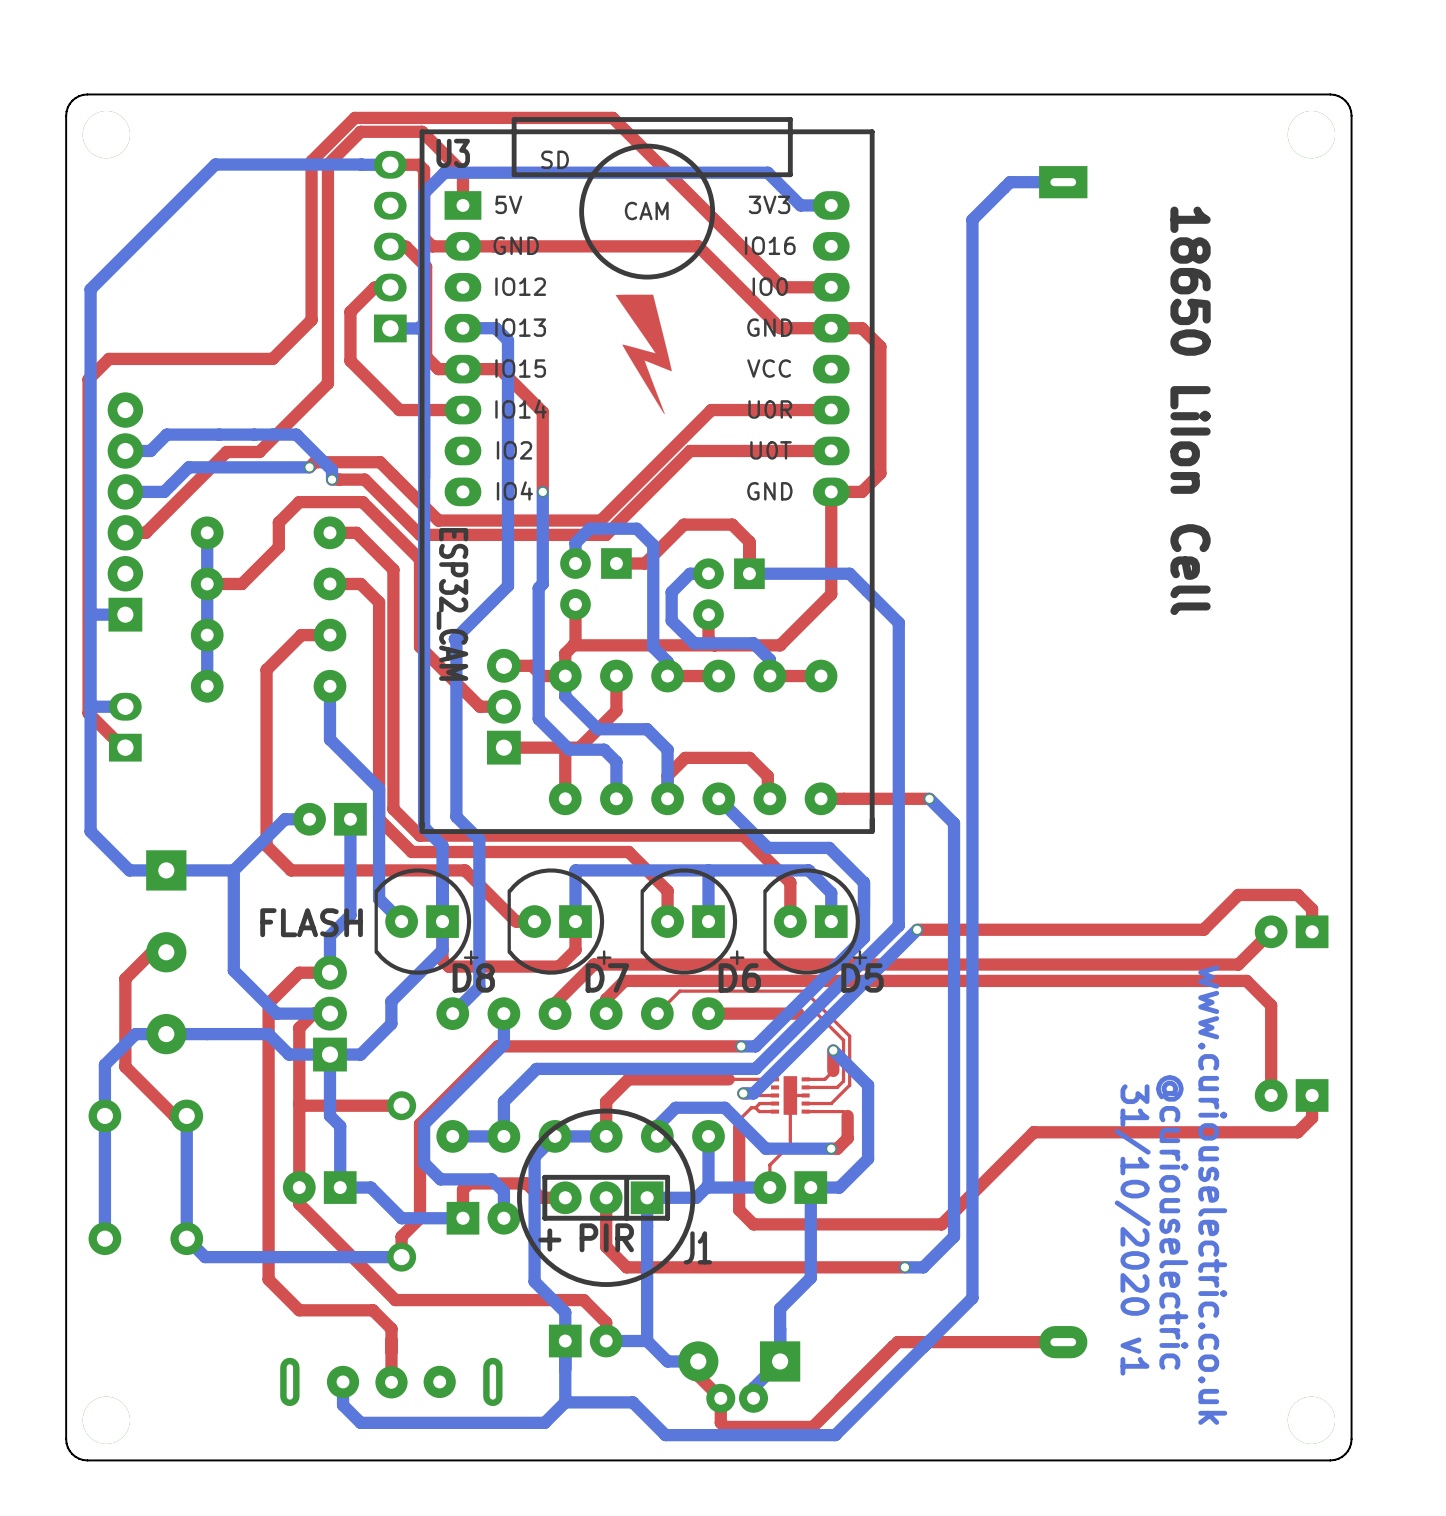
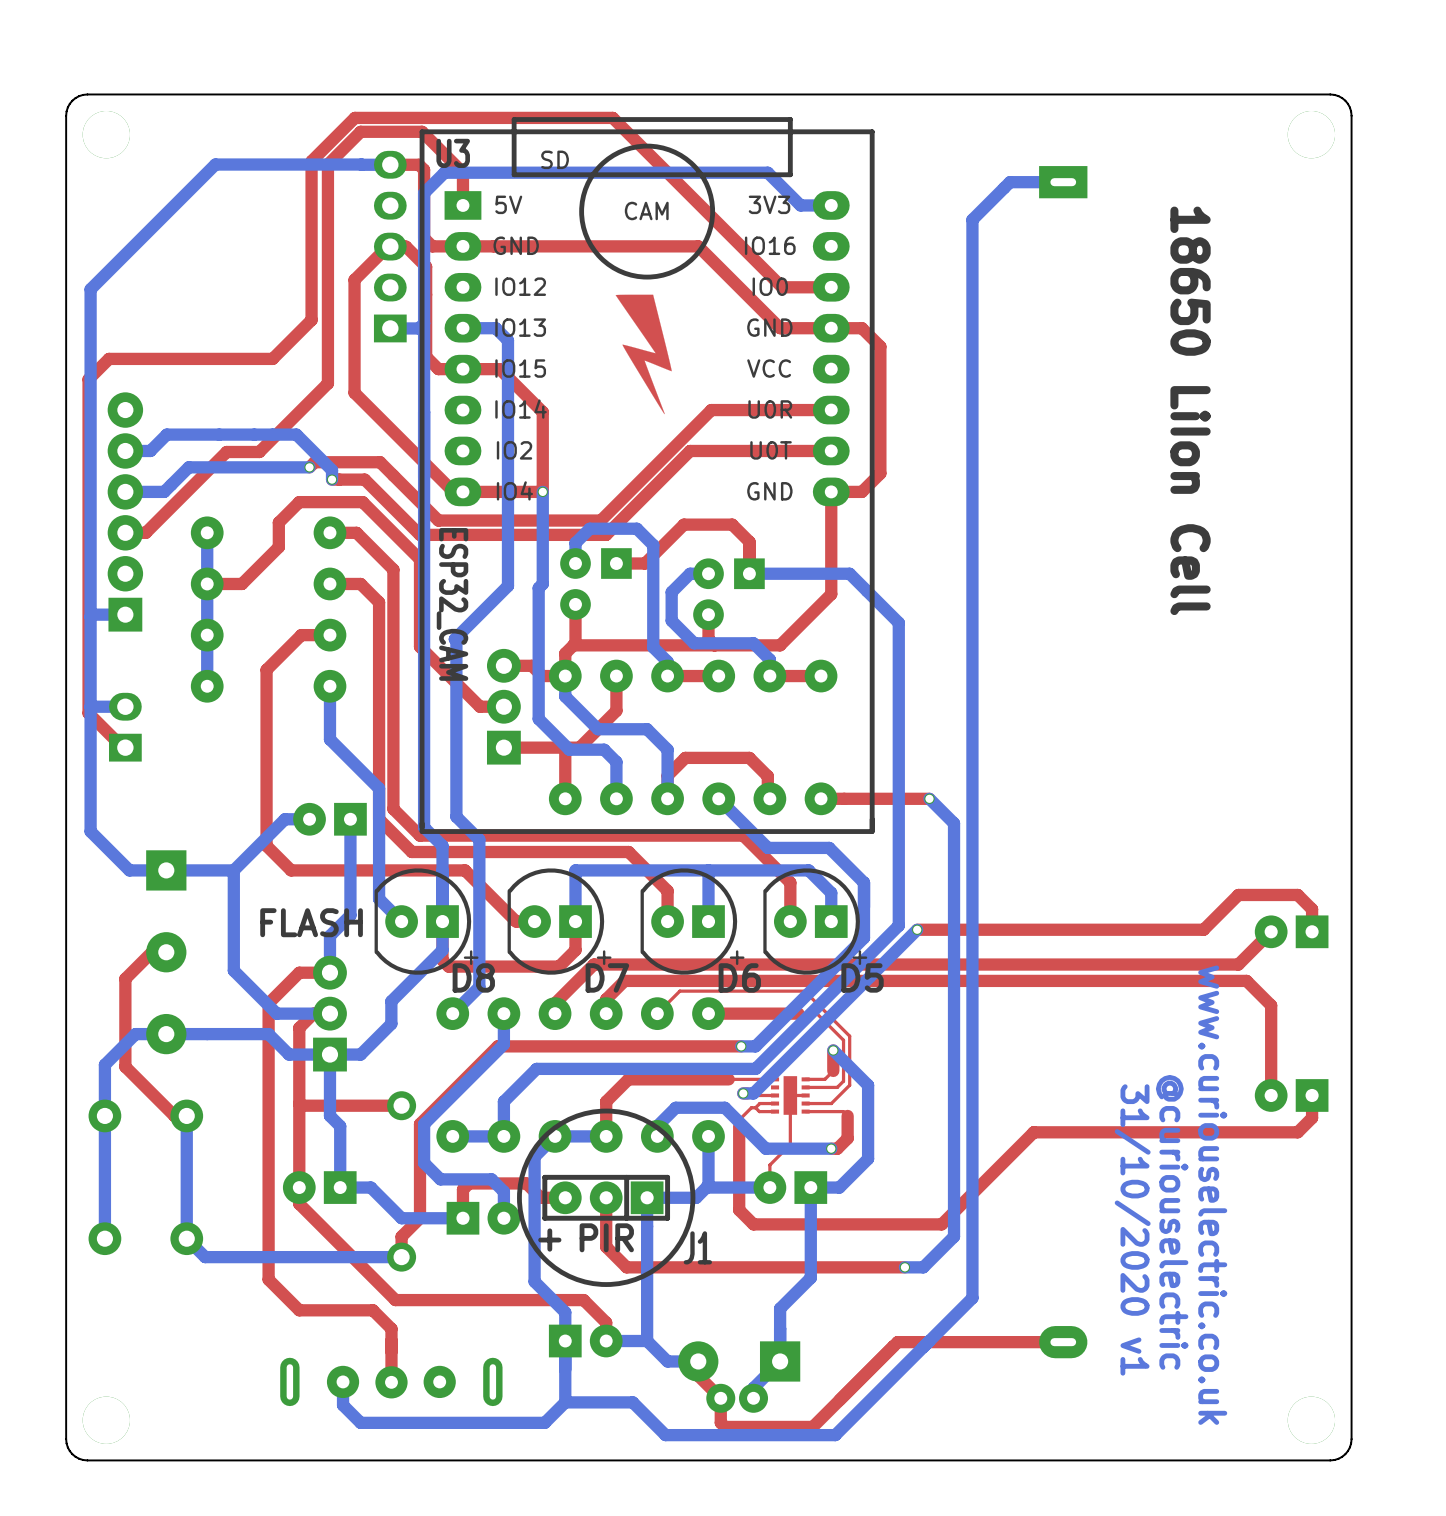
top track: none -> (390, 246) (387, 246) (354, 279) (354, 392) (453, 491) (542, 491)
top track: (390, 287) (374, 287) (350, 311) (350, 360) (399, 410) (462, 410) -> none

